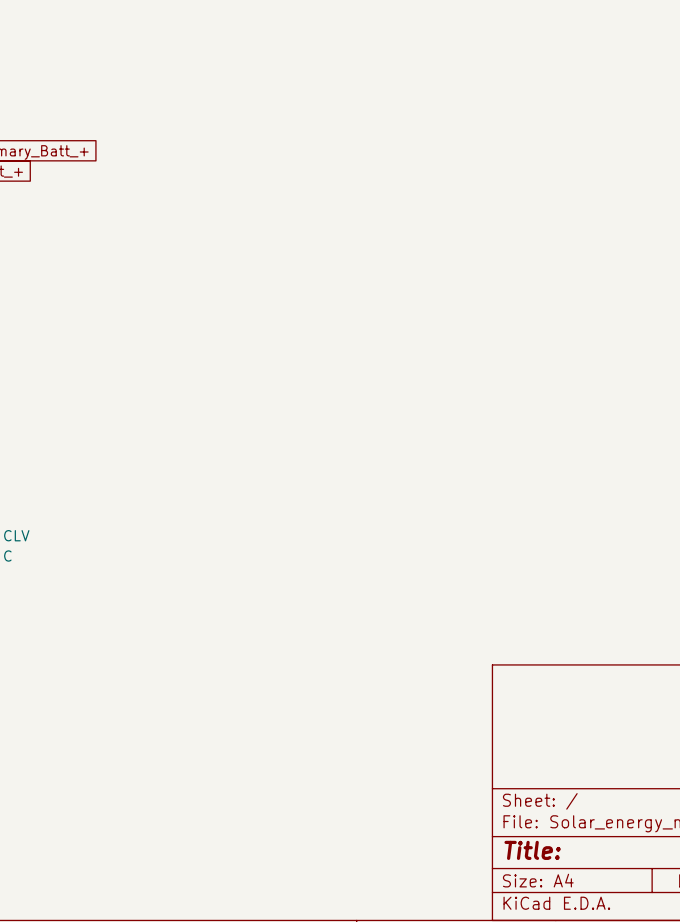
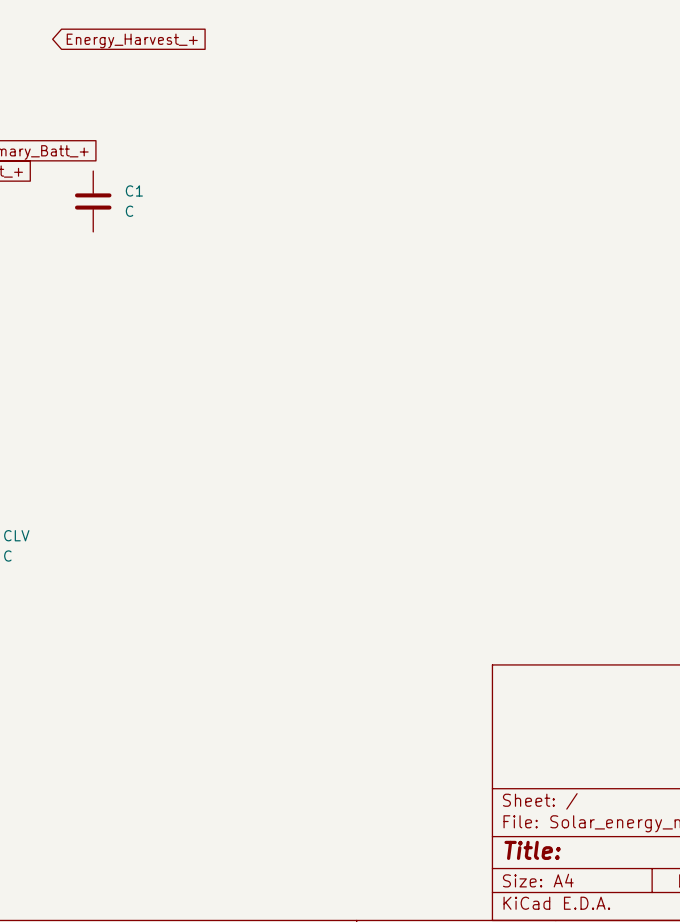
global label: none -> Energy_Harvest_+ (132, 40)
C1: none -> C (93, 201)

